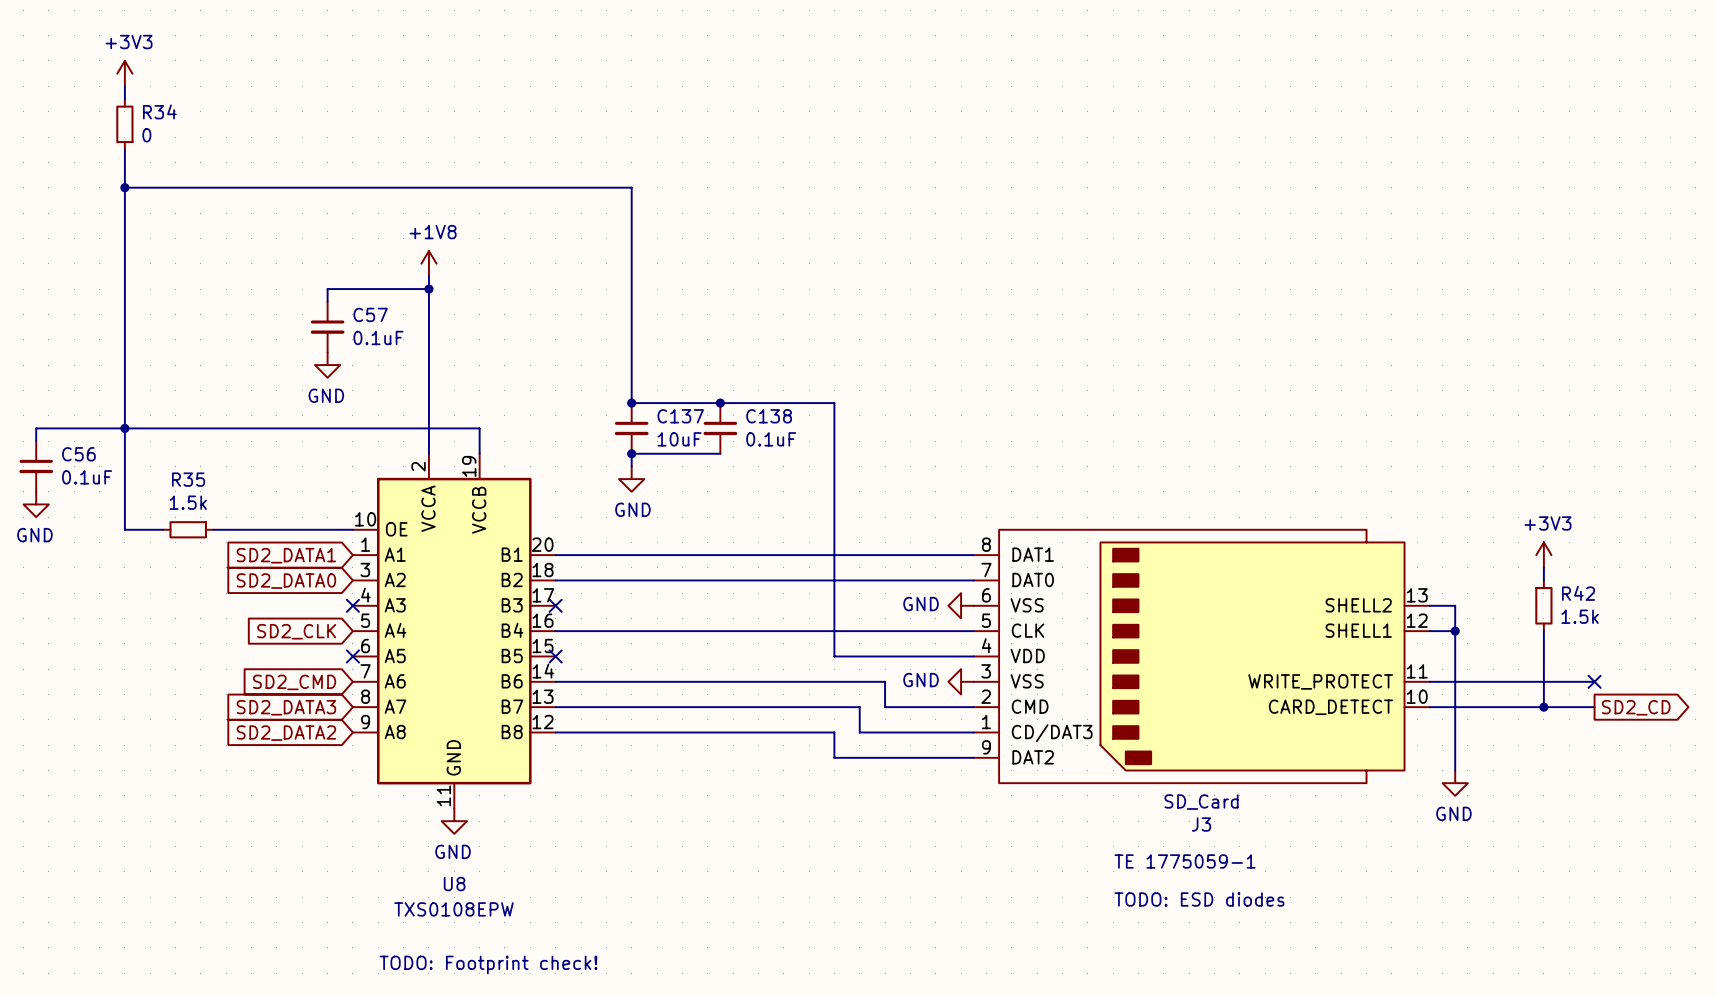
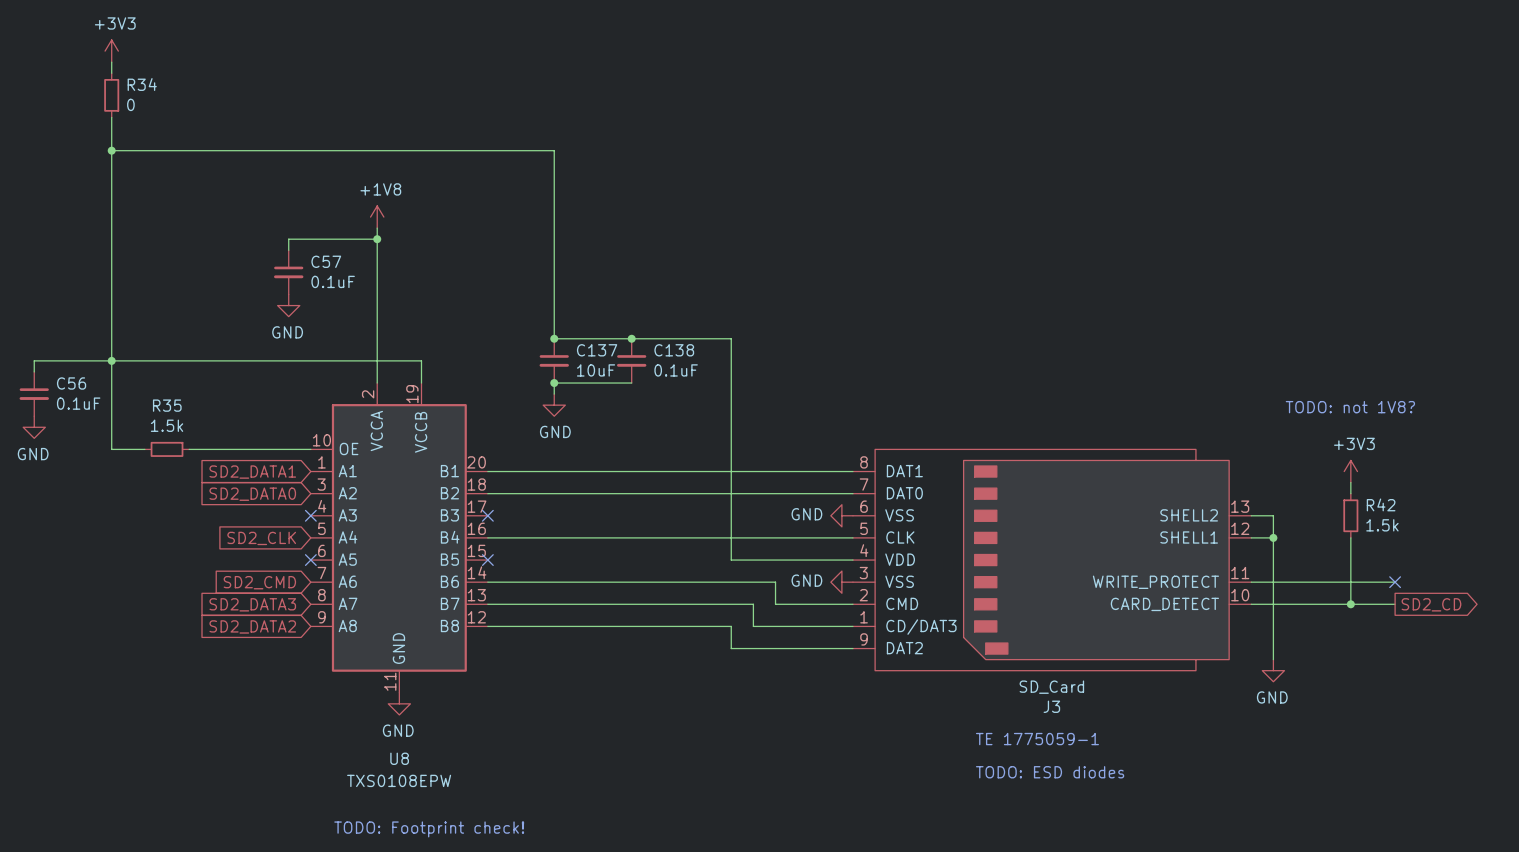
text: none -> TODO: not 1V8? (1350, 407)

